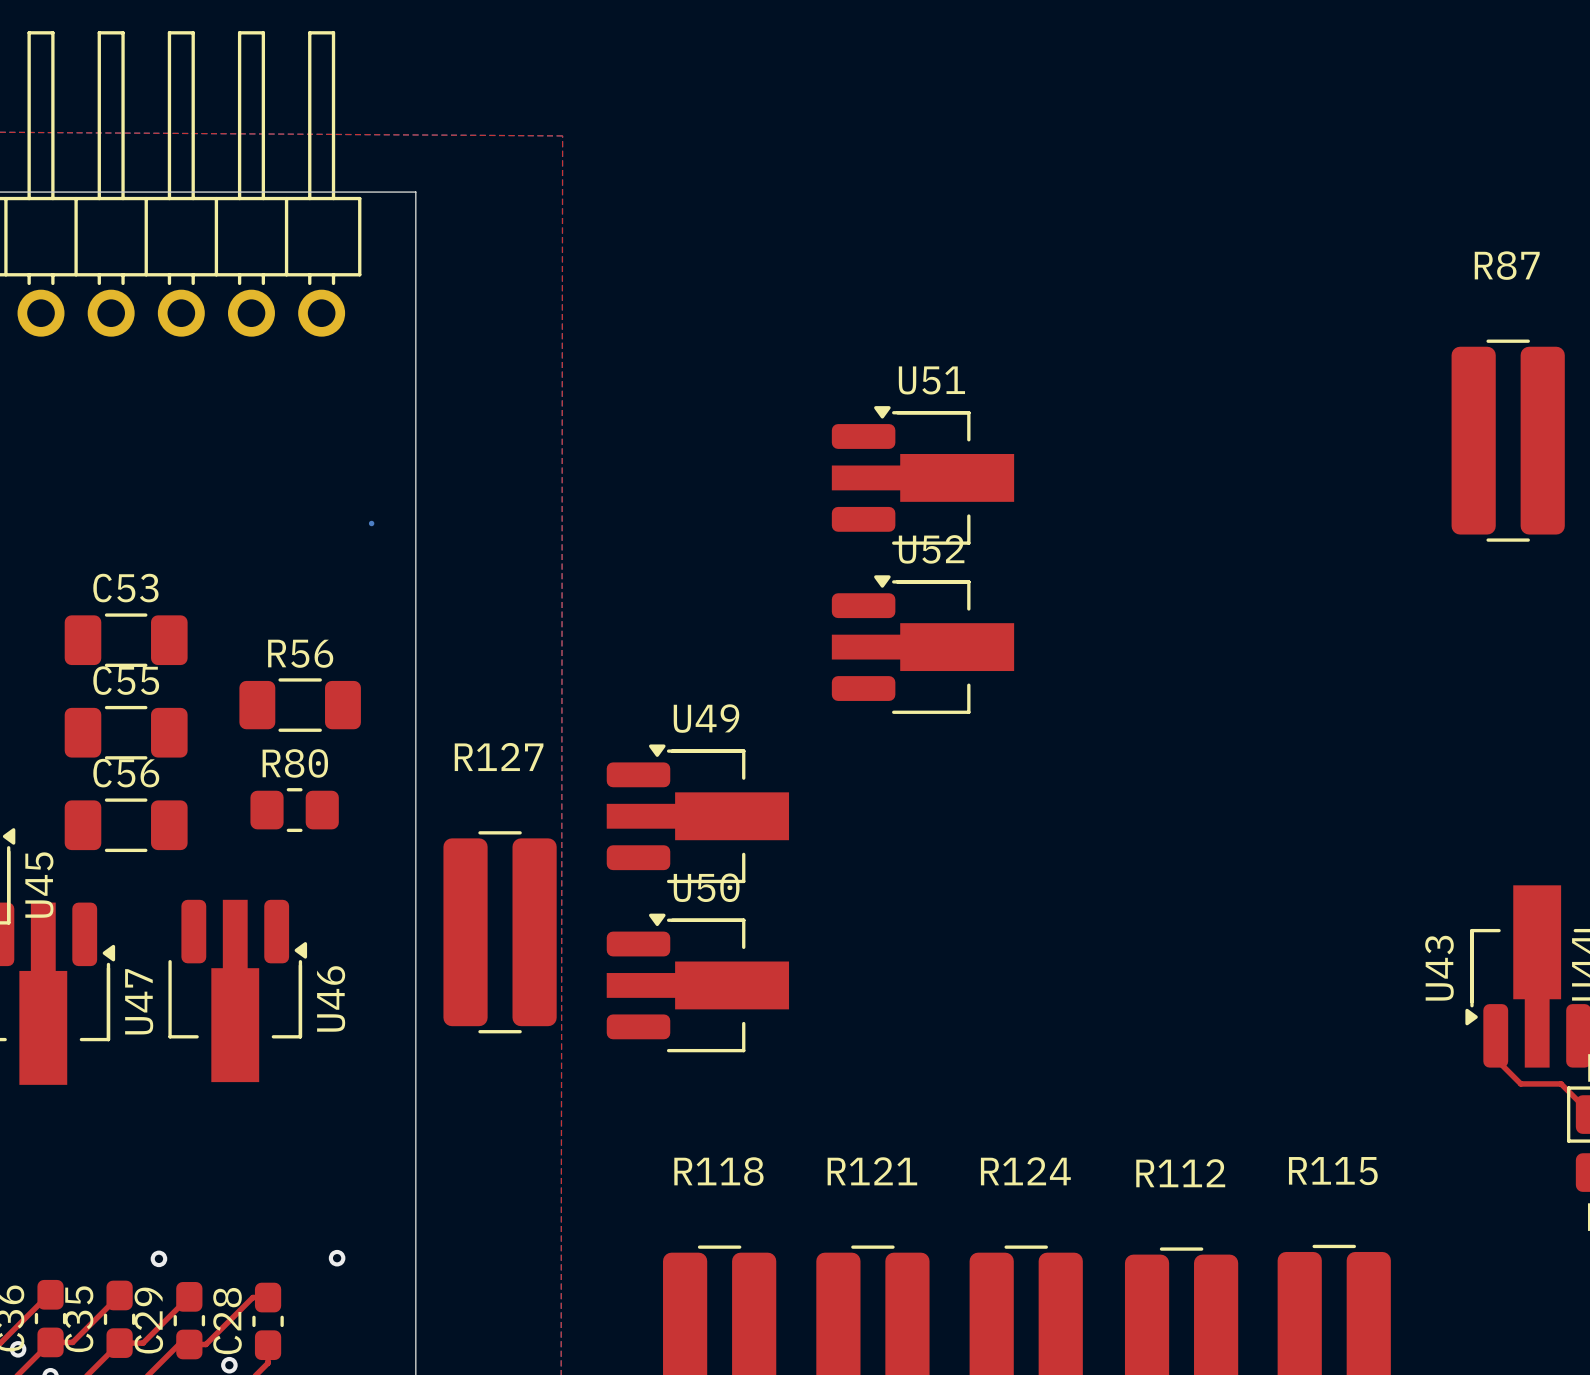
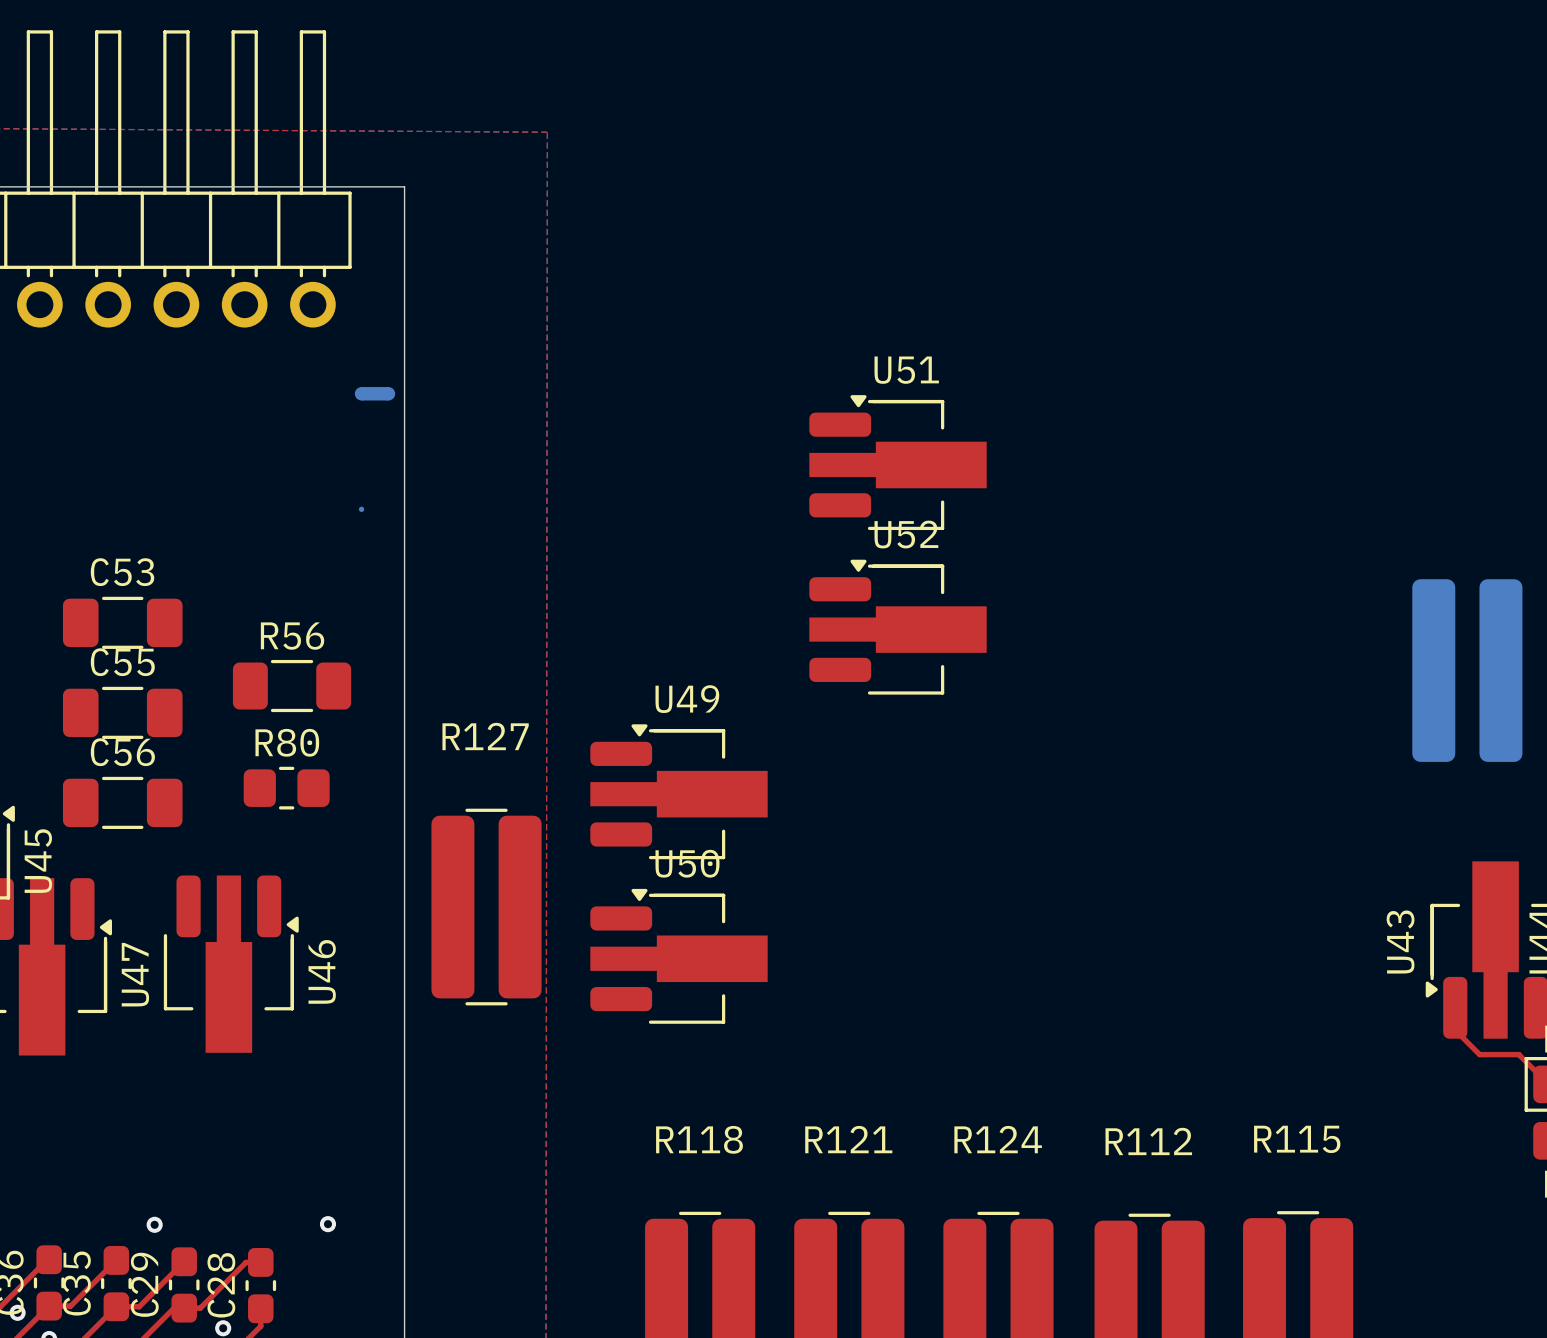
part: none -> (375, 393)
R87: (1508, 440) -> none
part: none -> (1467, 670)

